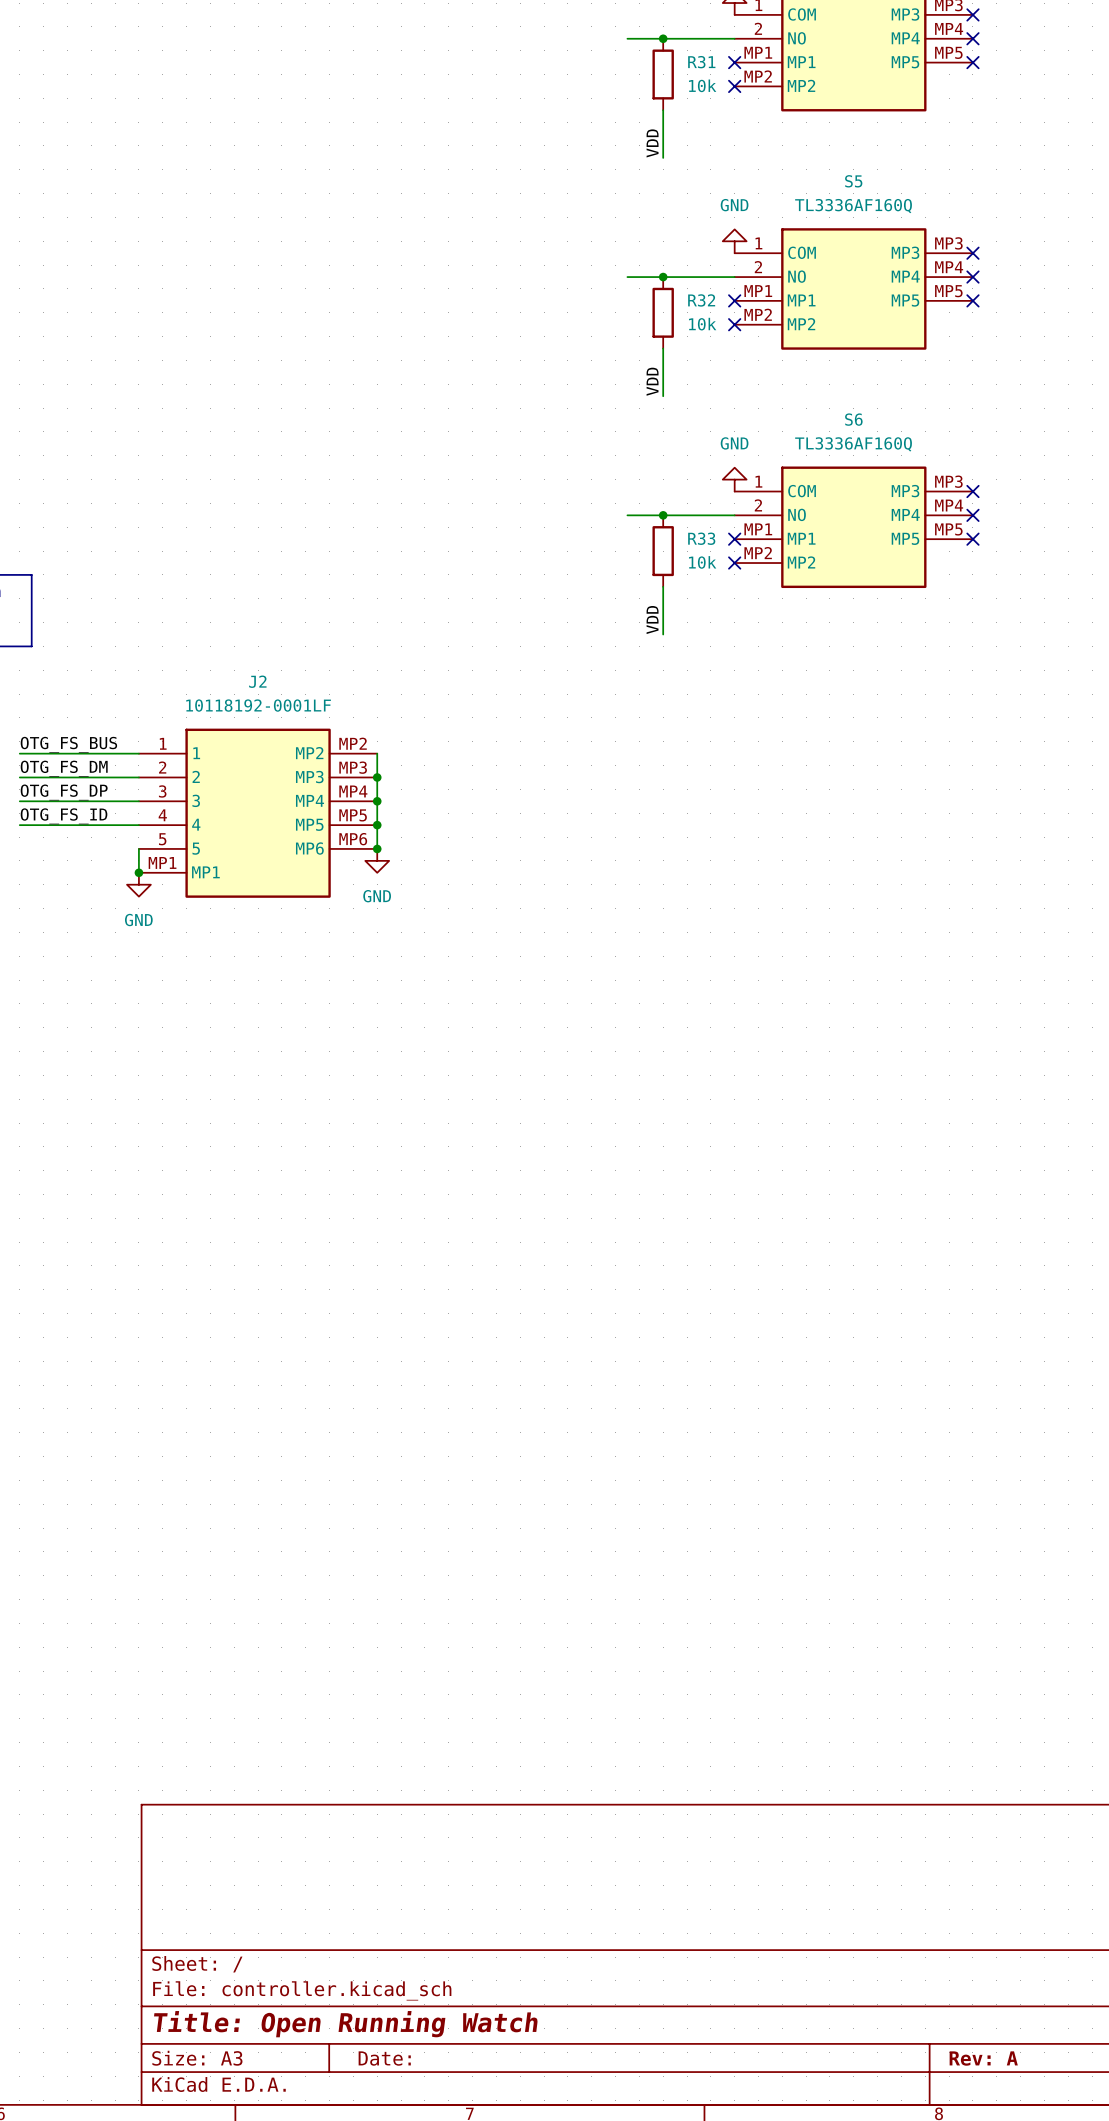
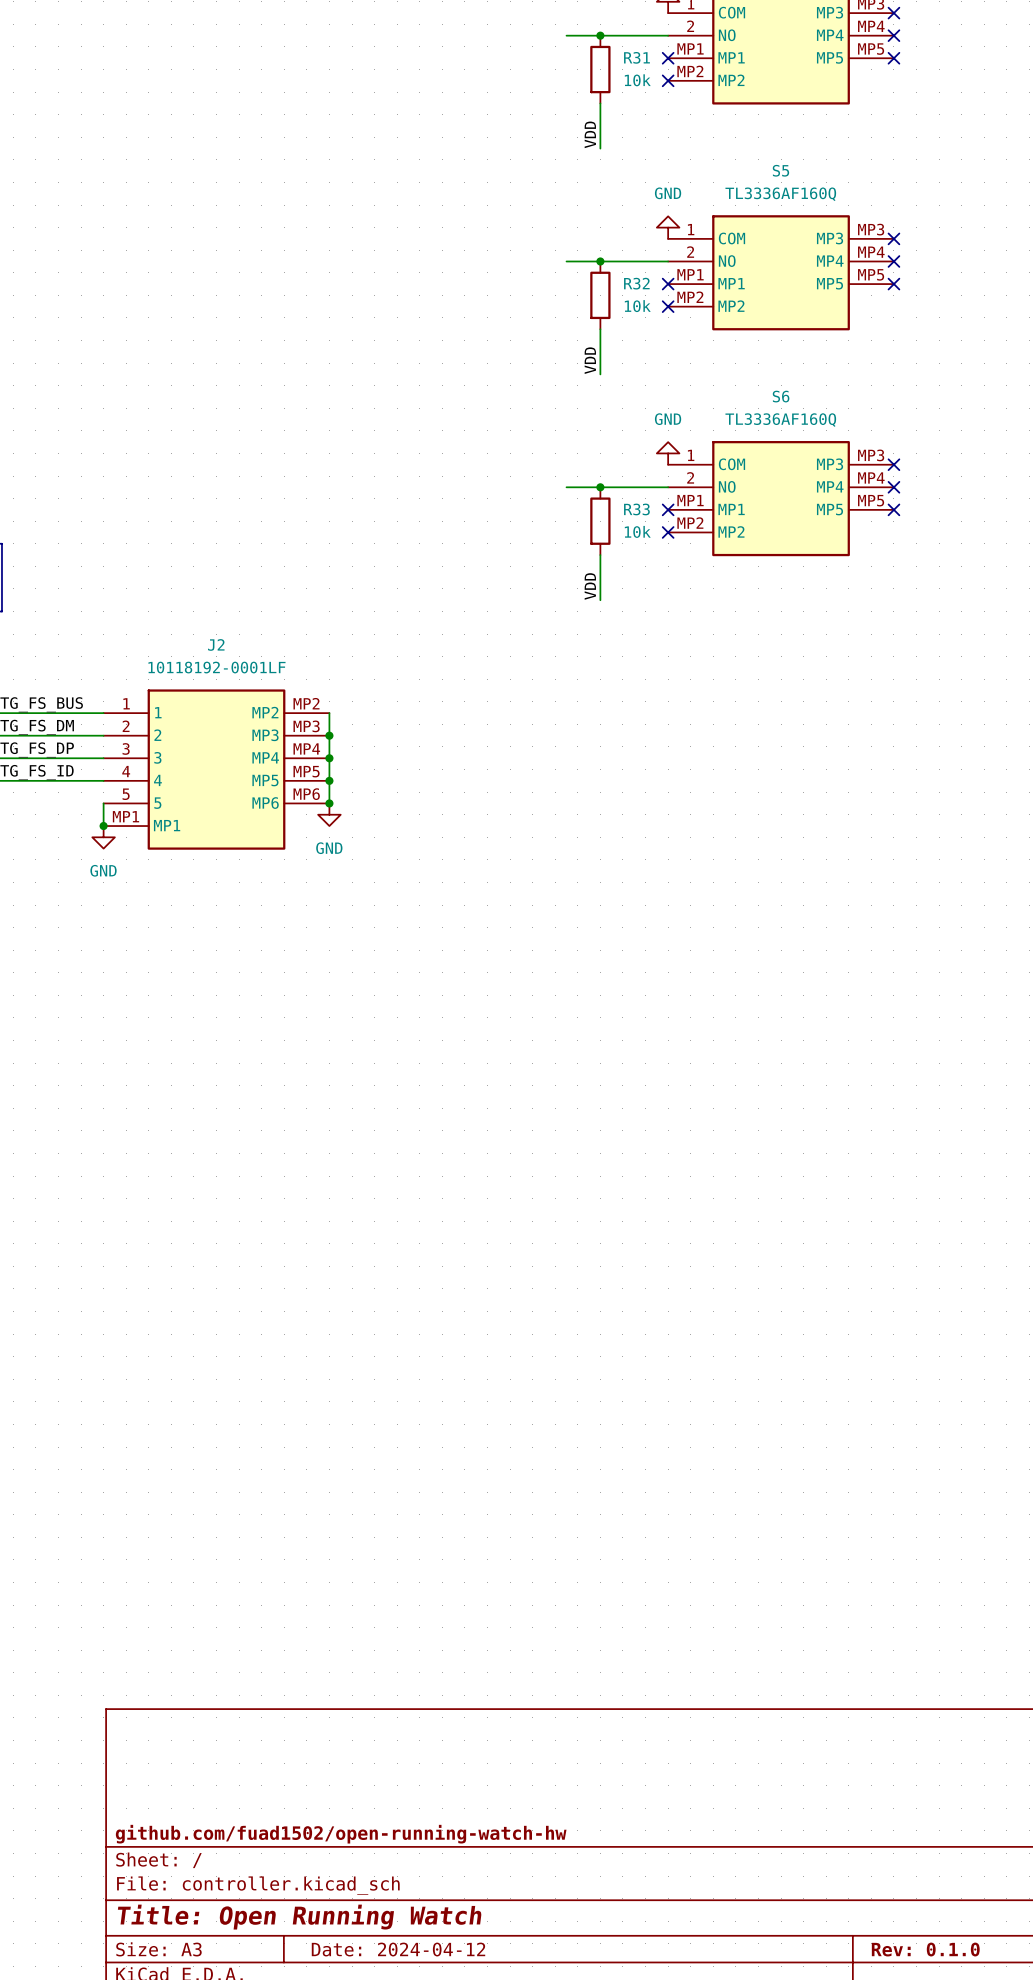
title block: none -> github.com/fuad1502/open-running-watch-hw (341, 1834)
title block: Date: (384, 2058) -> Date: 2024-04-12 (398, 1949)
title block: Rev: A (983, 2058) -> Rev: 0.1.0 (925, 1949)

